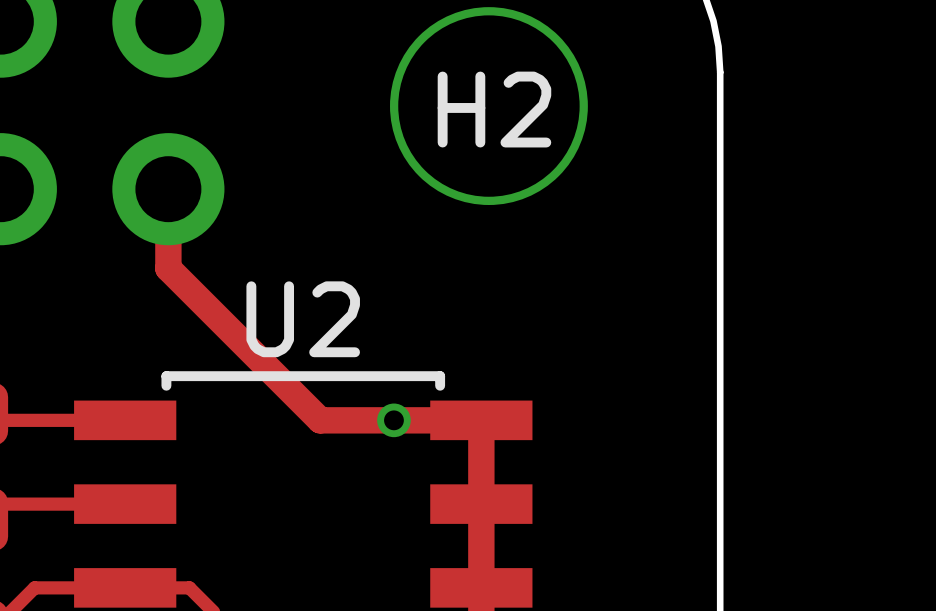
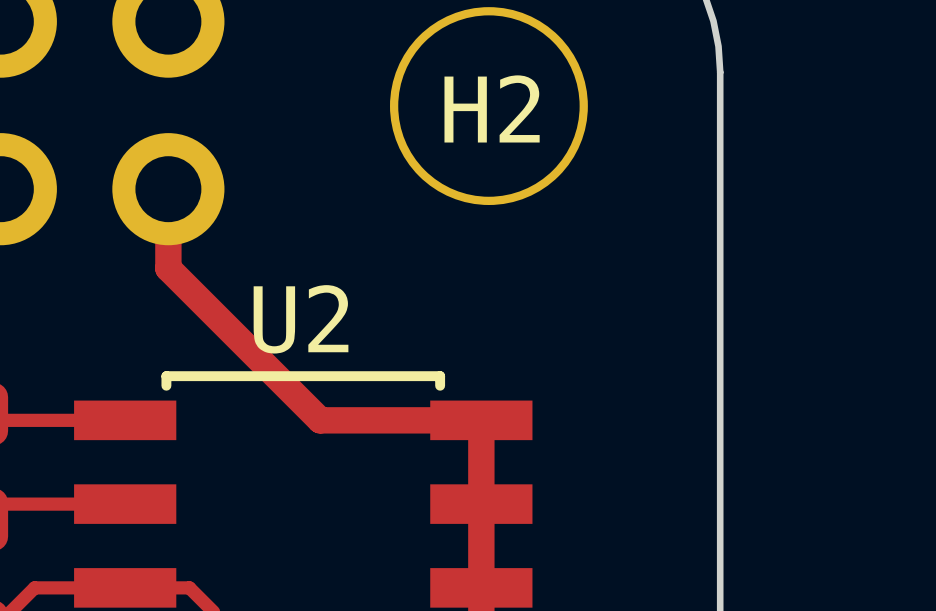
via: (393, 420) -> none

